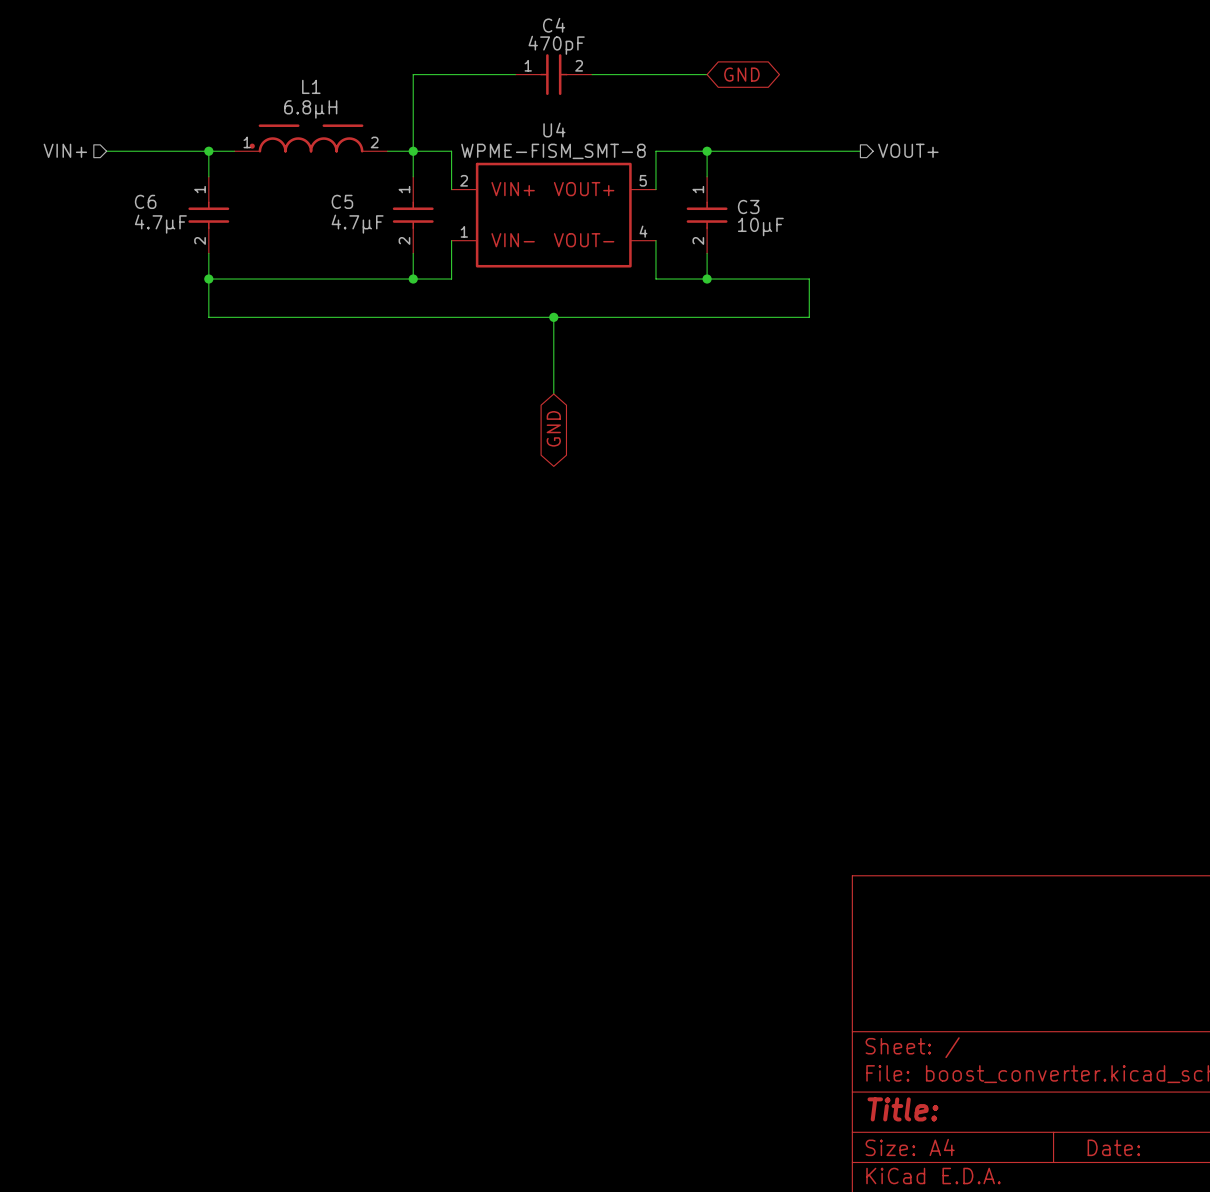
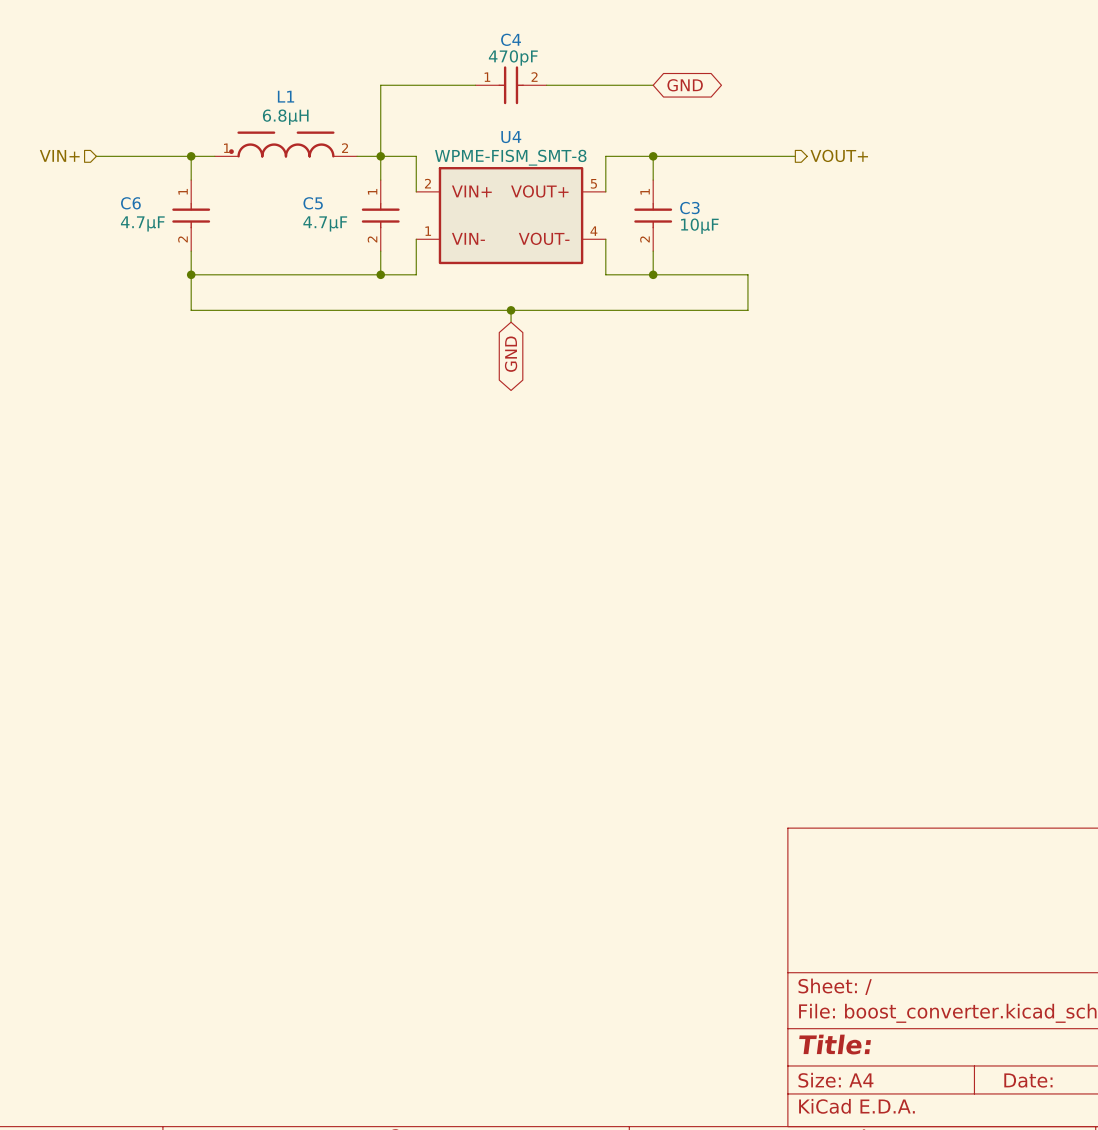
wire: (553, 330) (553, 394) -> none
global label position: GND (553, 428) -> GND (511, 354)

